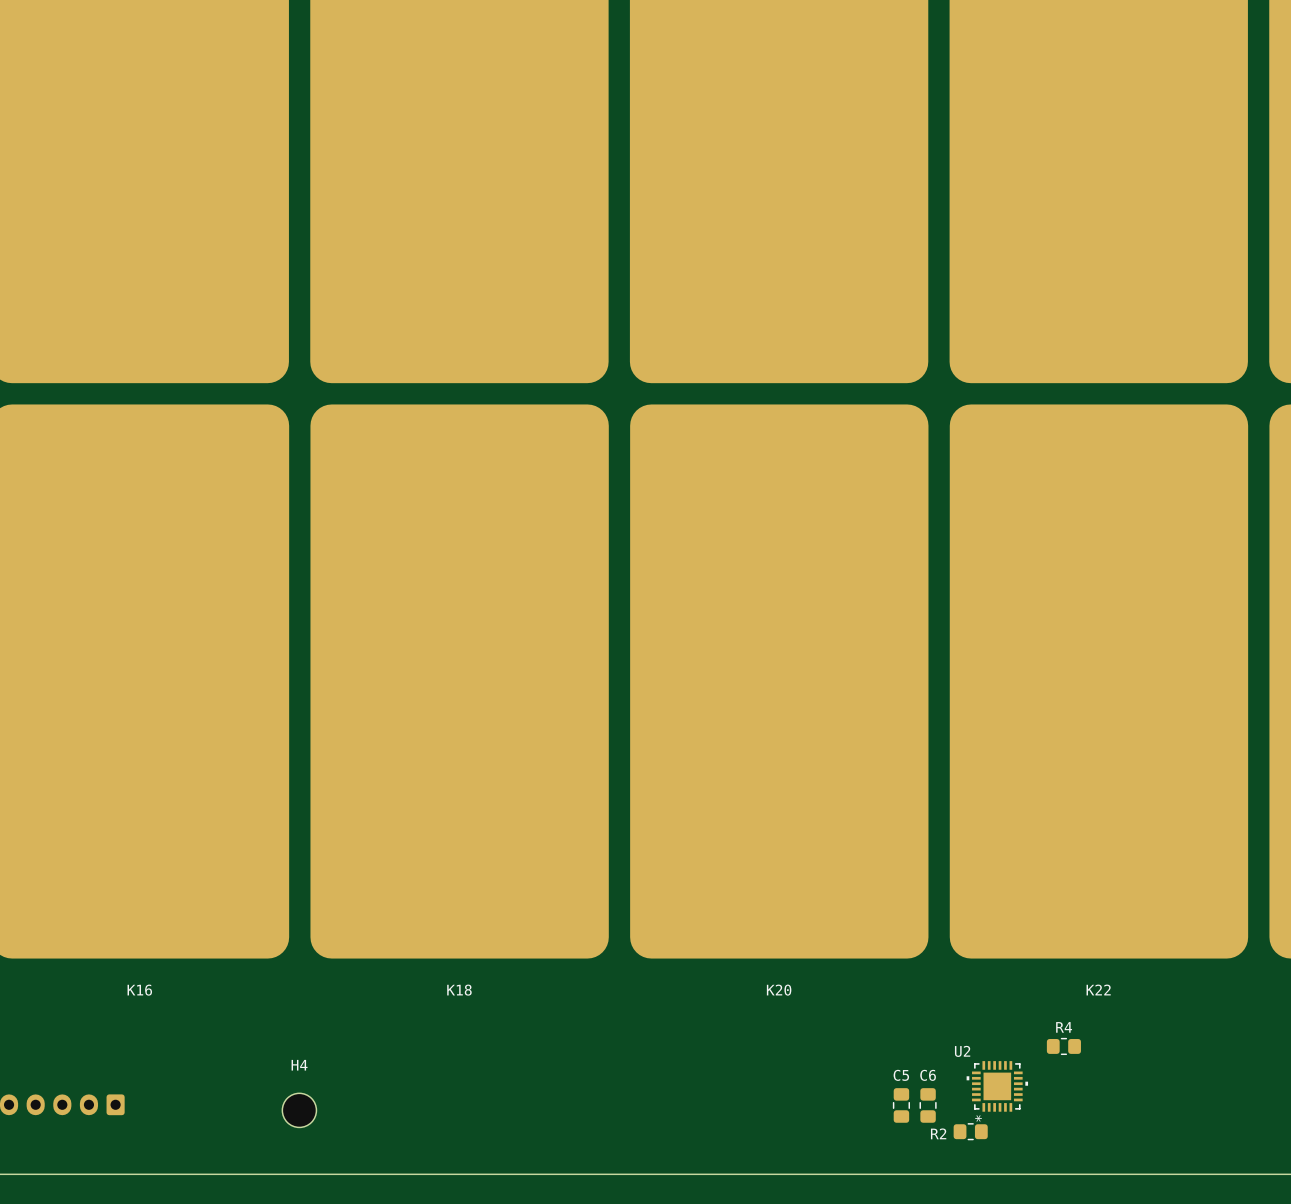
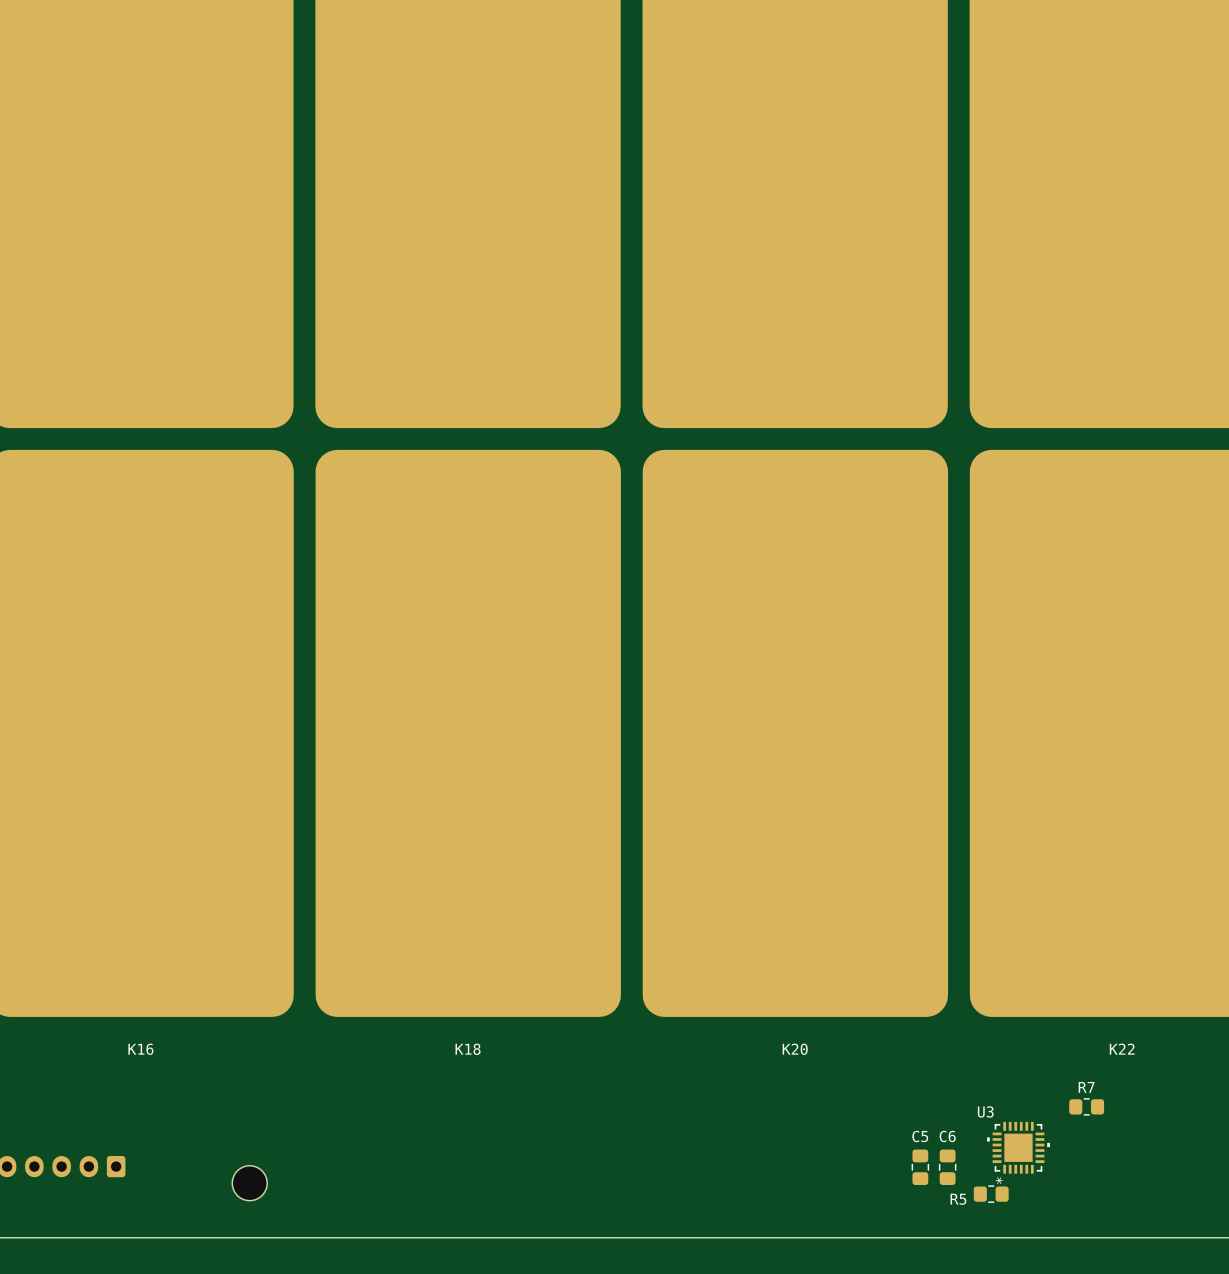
R4 name: R4 (1064, 1027) -> R7 (1086, 1087)
U2 name: U2 (962, 1051) -> U3 (985, 1111)
H4: (299, 1110) -> none
part: none -> (249, 1183)
R2 name: R2 (938, 1133) -> R5 (958, 1199)

